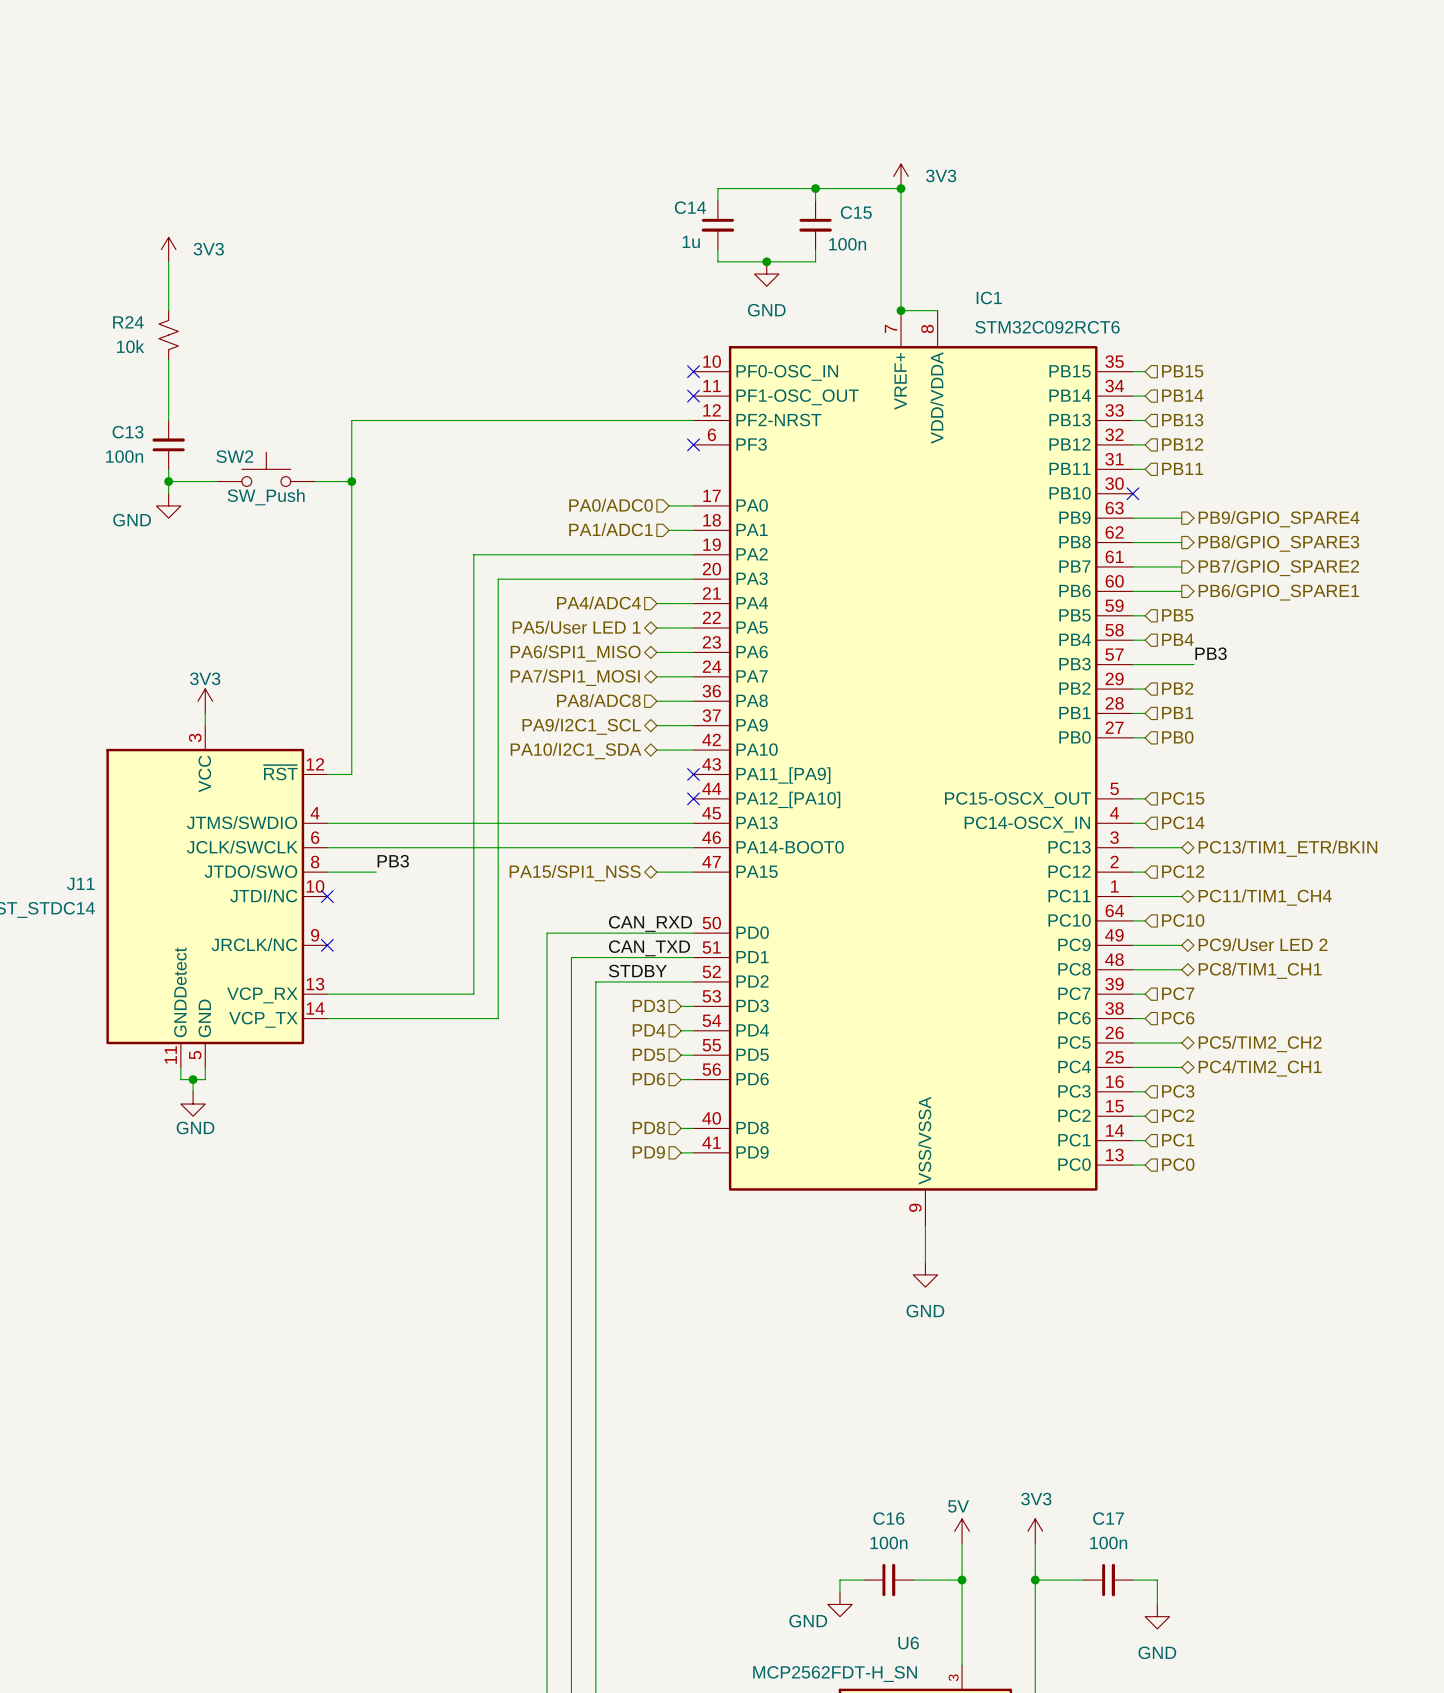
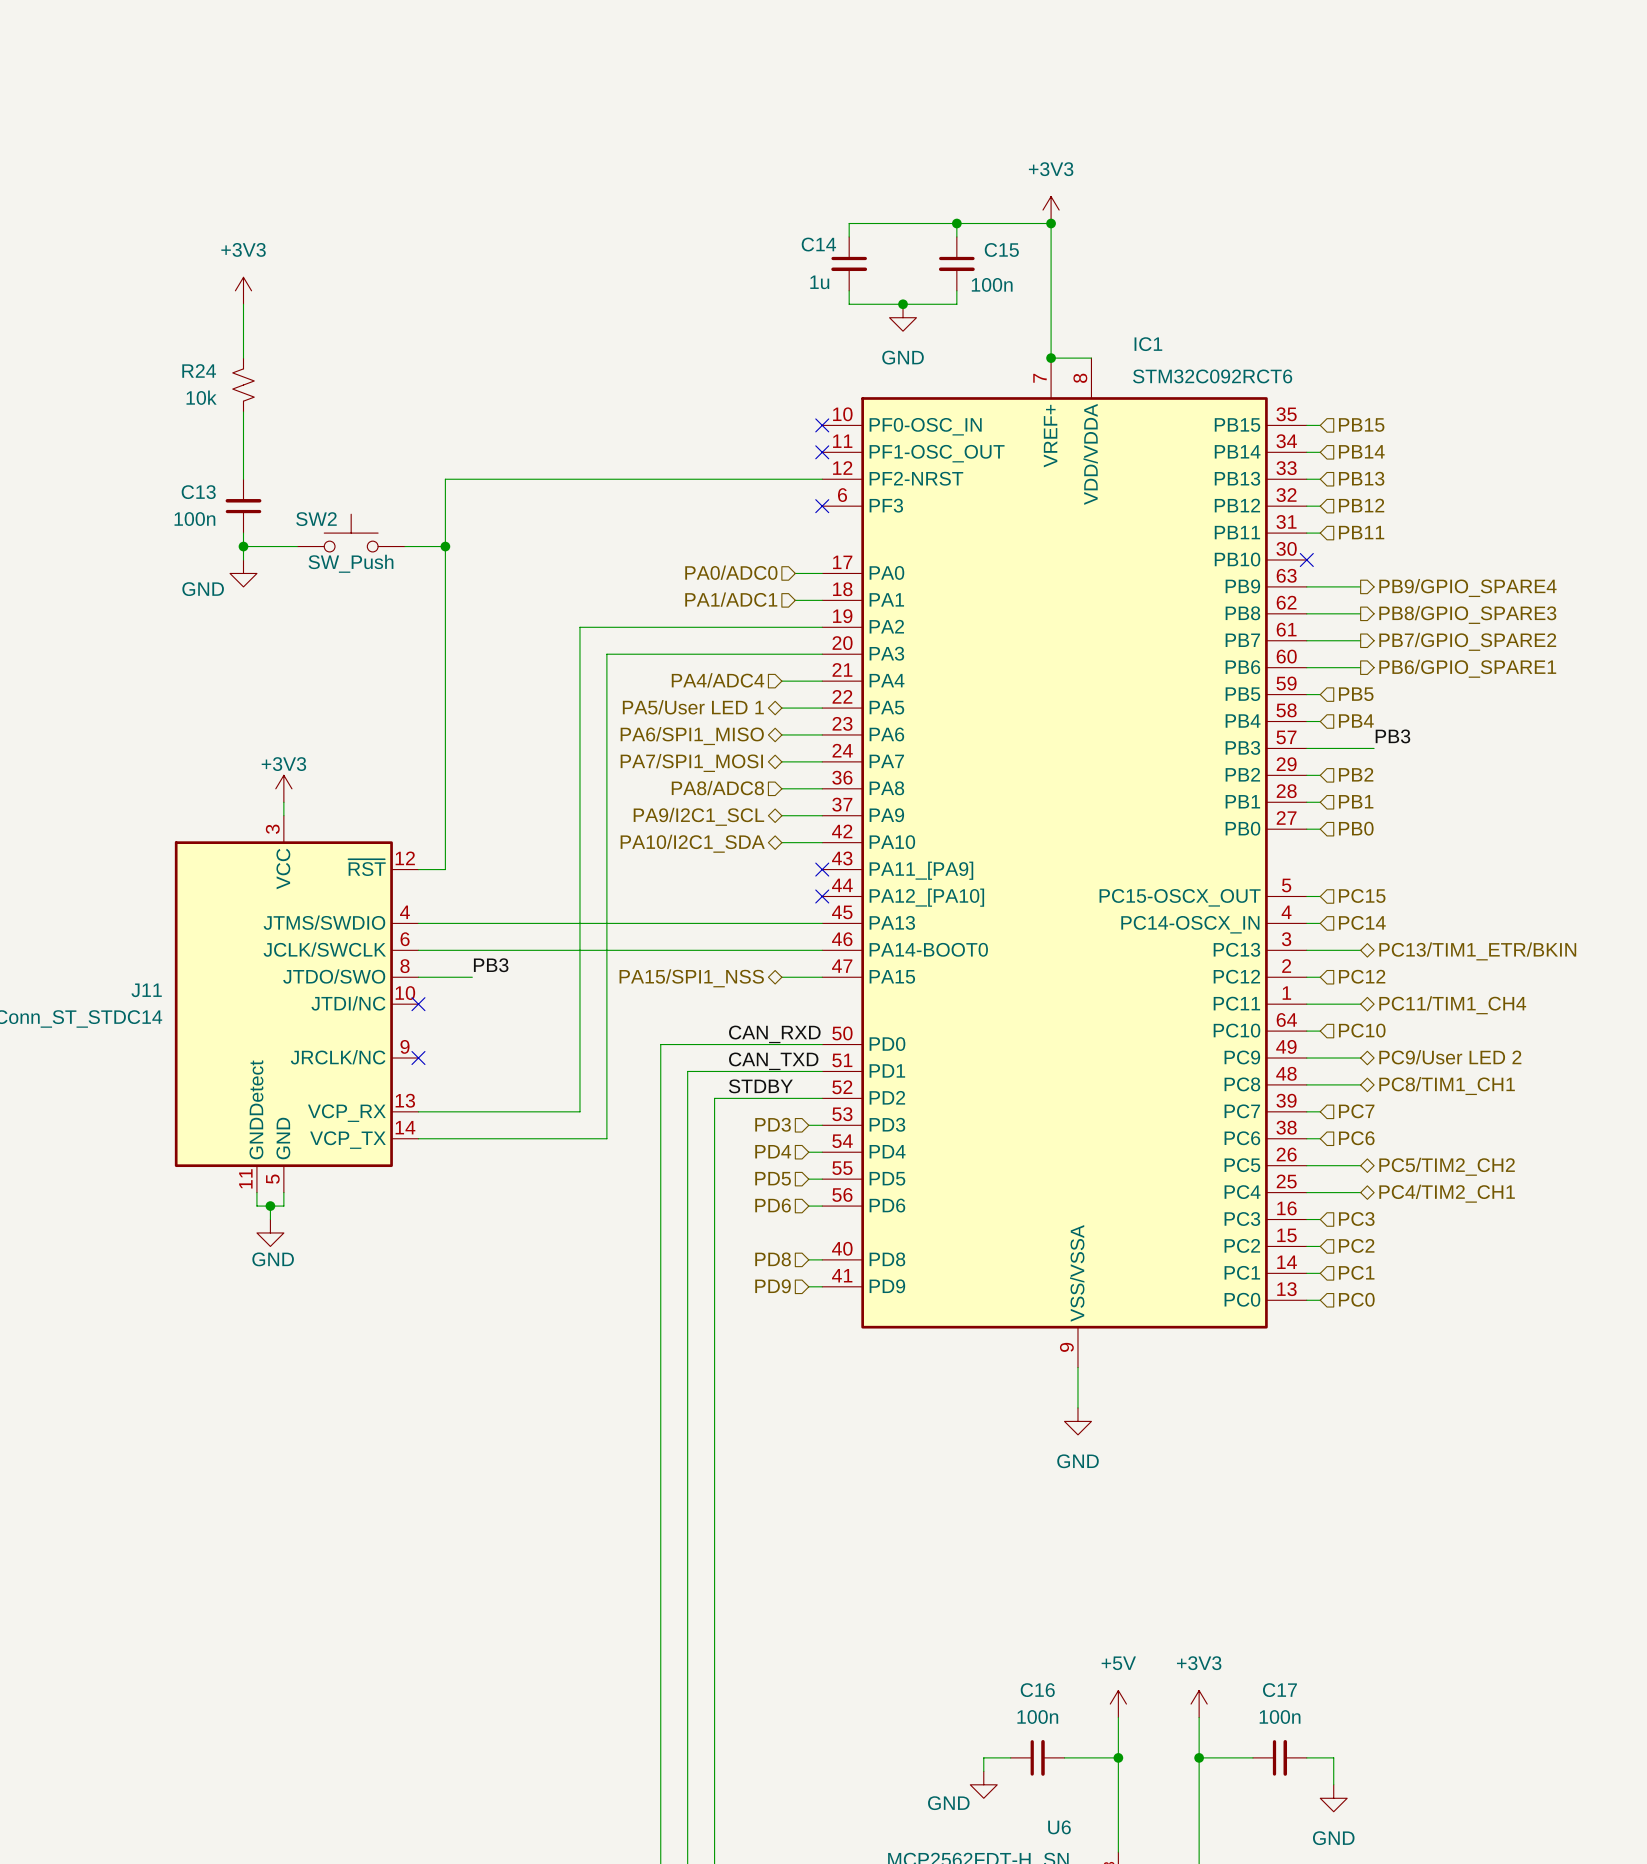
power symbol: 3V3 (901, 176) -> +3V3 (1051, 210)
power symbol: 3V3 (168, 249) -> +3V3 (243, 290)
power symbol: 3V3 (205, 701) -> +3V3 (283, 788)
power symbol: 5V (962, 1531) -> +5V (1118, 1704)
power symbol: 3V3 (1035, 1531) -> +3V3 (1199, 1704)

